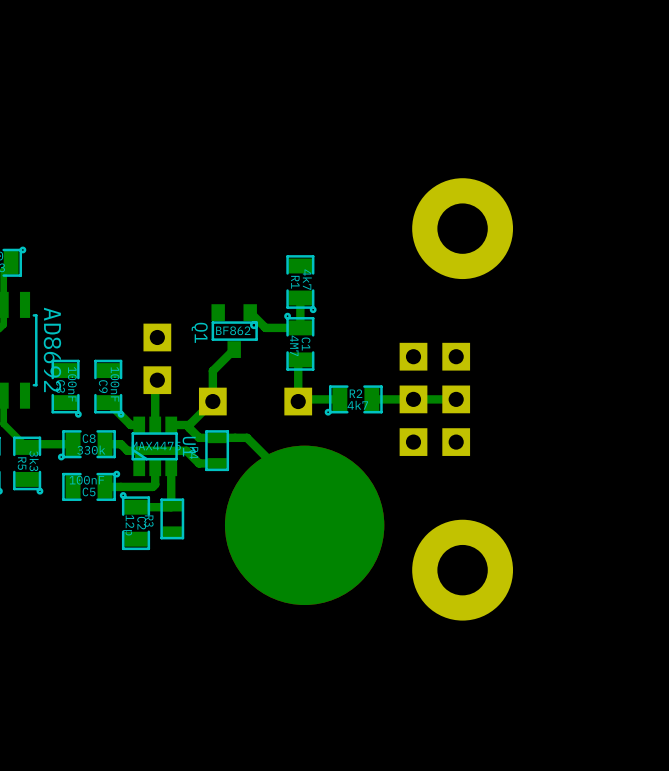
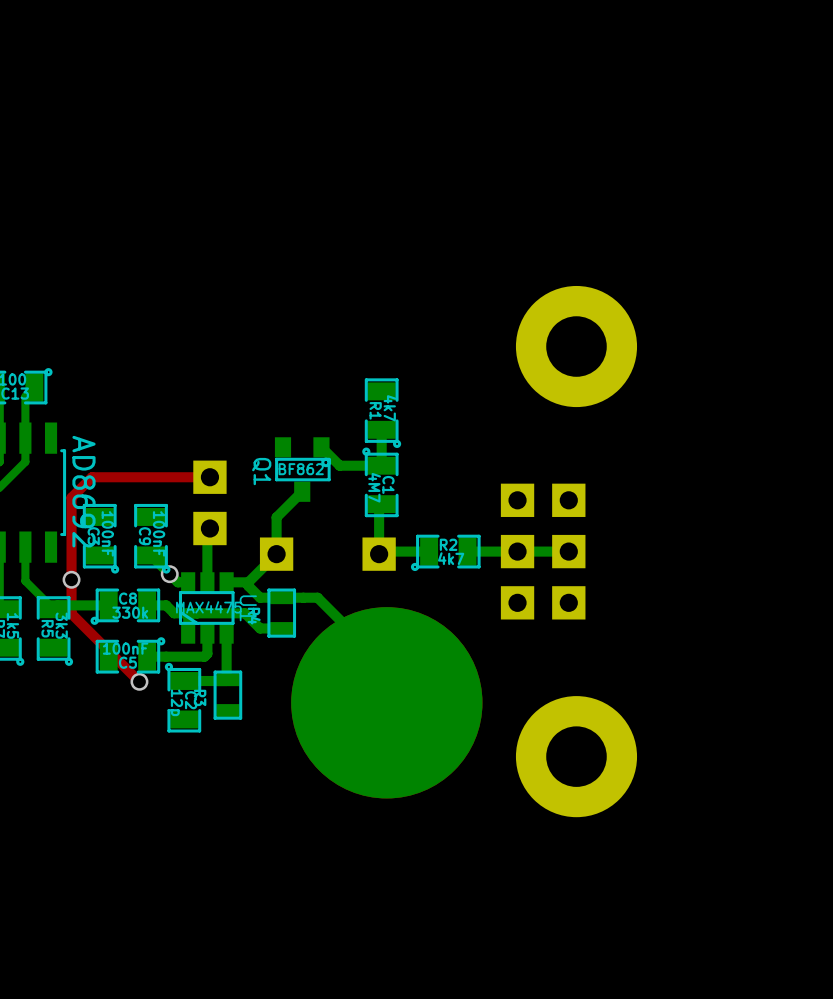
top track: none -> (209, 477) (92, 477) (71, 497) (71, 613) (139, 681)
via: none -> (169, 574)
via: none -> (71, 579)
via: none -> (139, 681)

